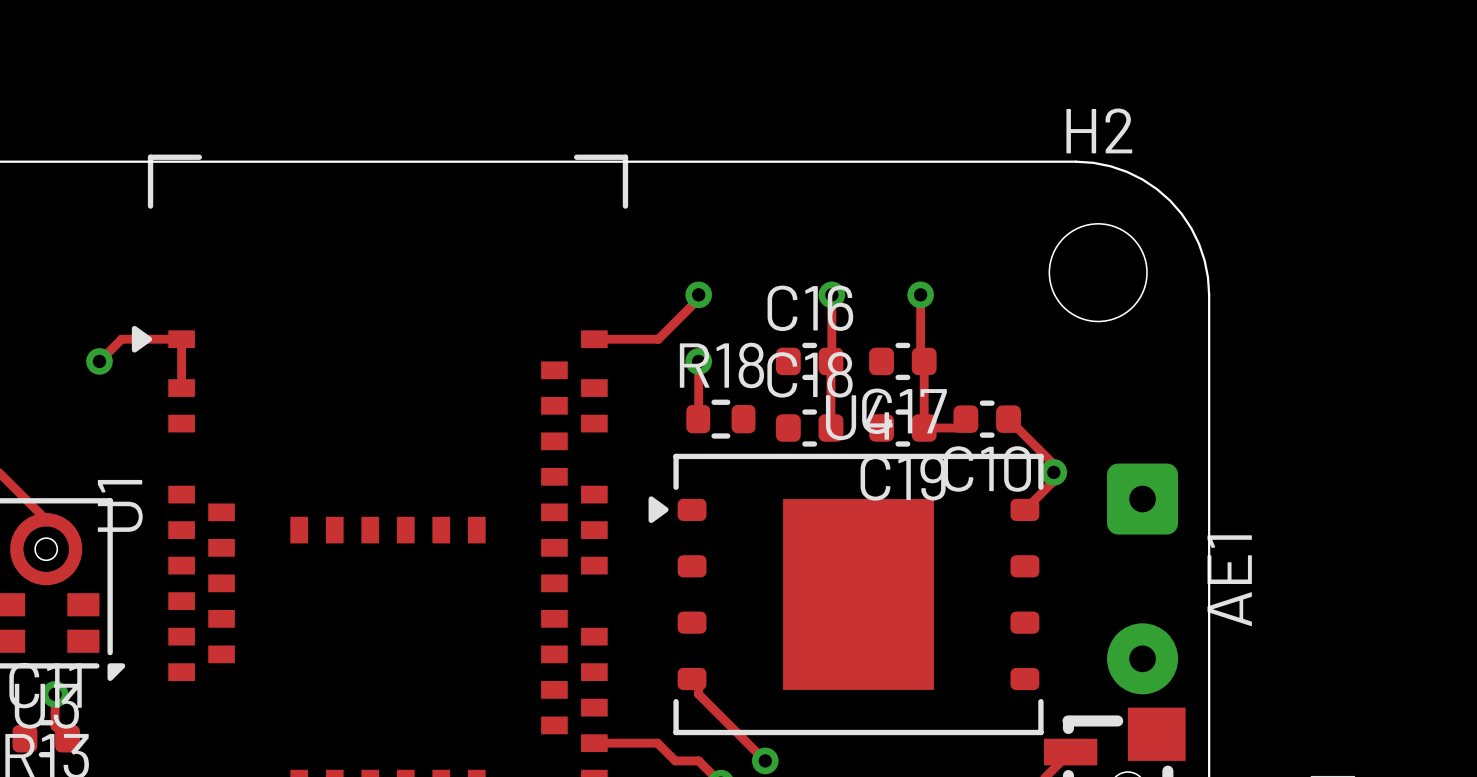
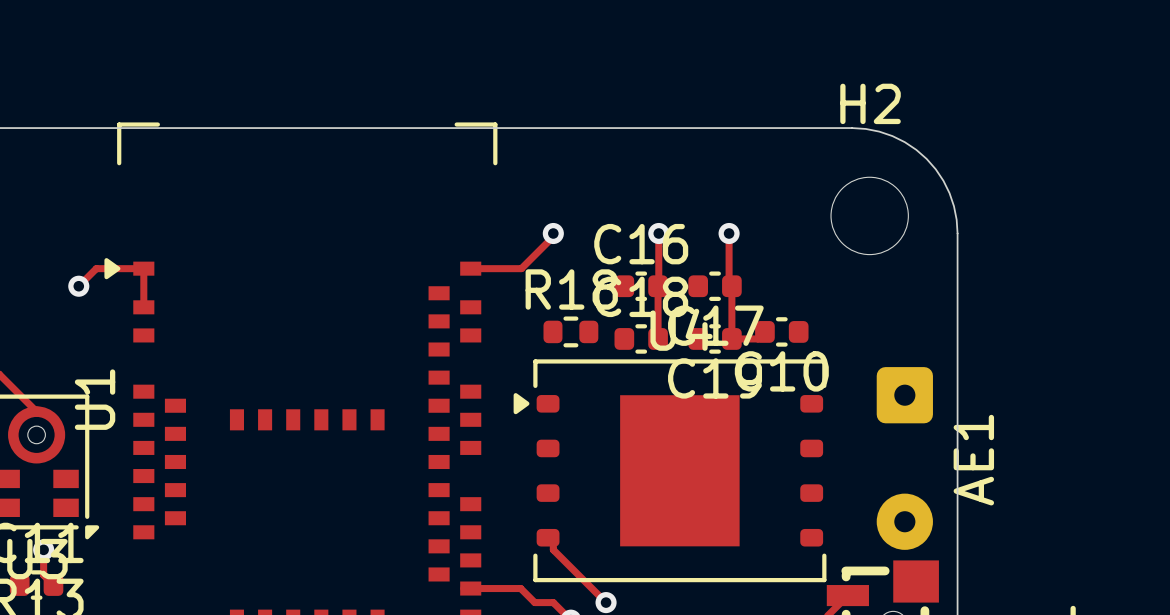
top track: (698, 361) (698, 418) -> none
via: (698, 361) -> none
top track: (1008, 419) (1053, 464) (1053, 481) (1024, 509) -> none
via: (1053, 472) -> none

